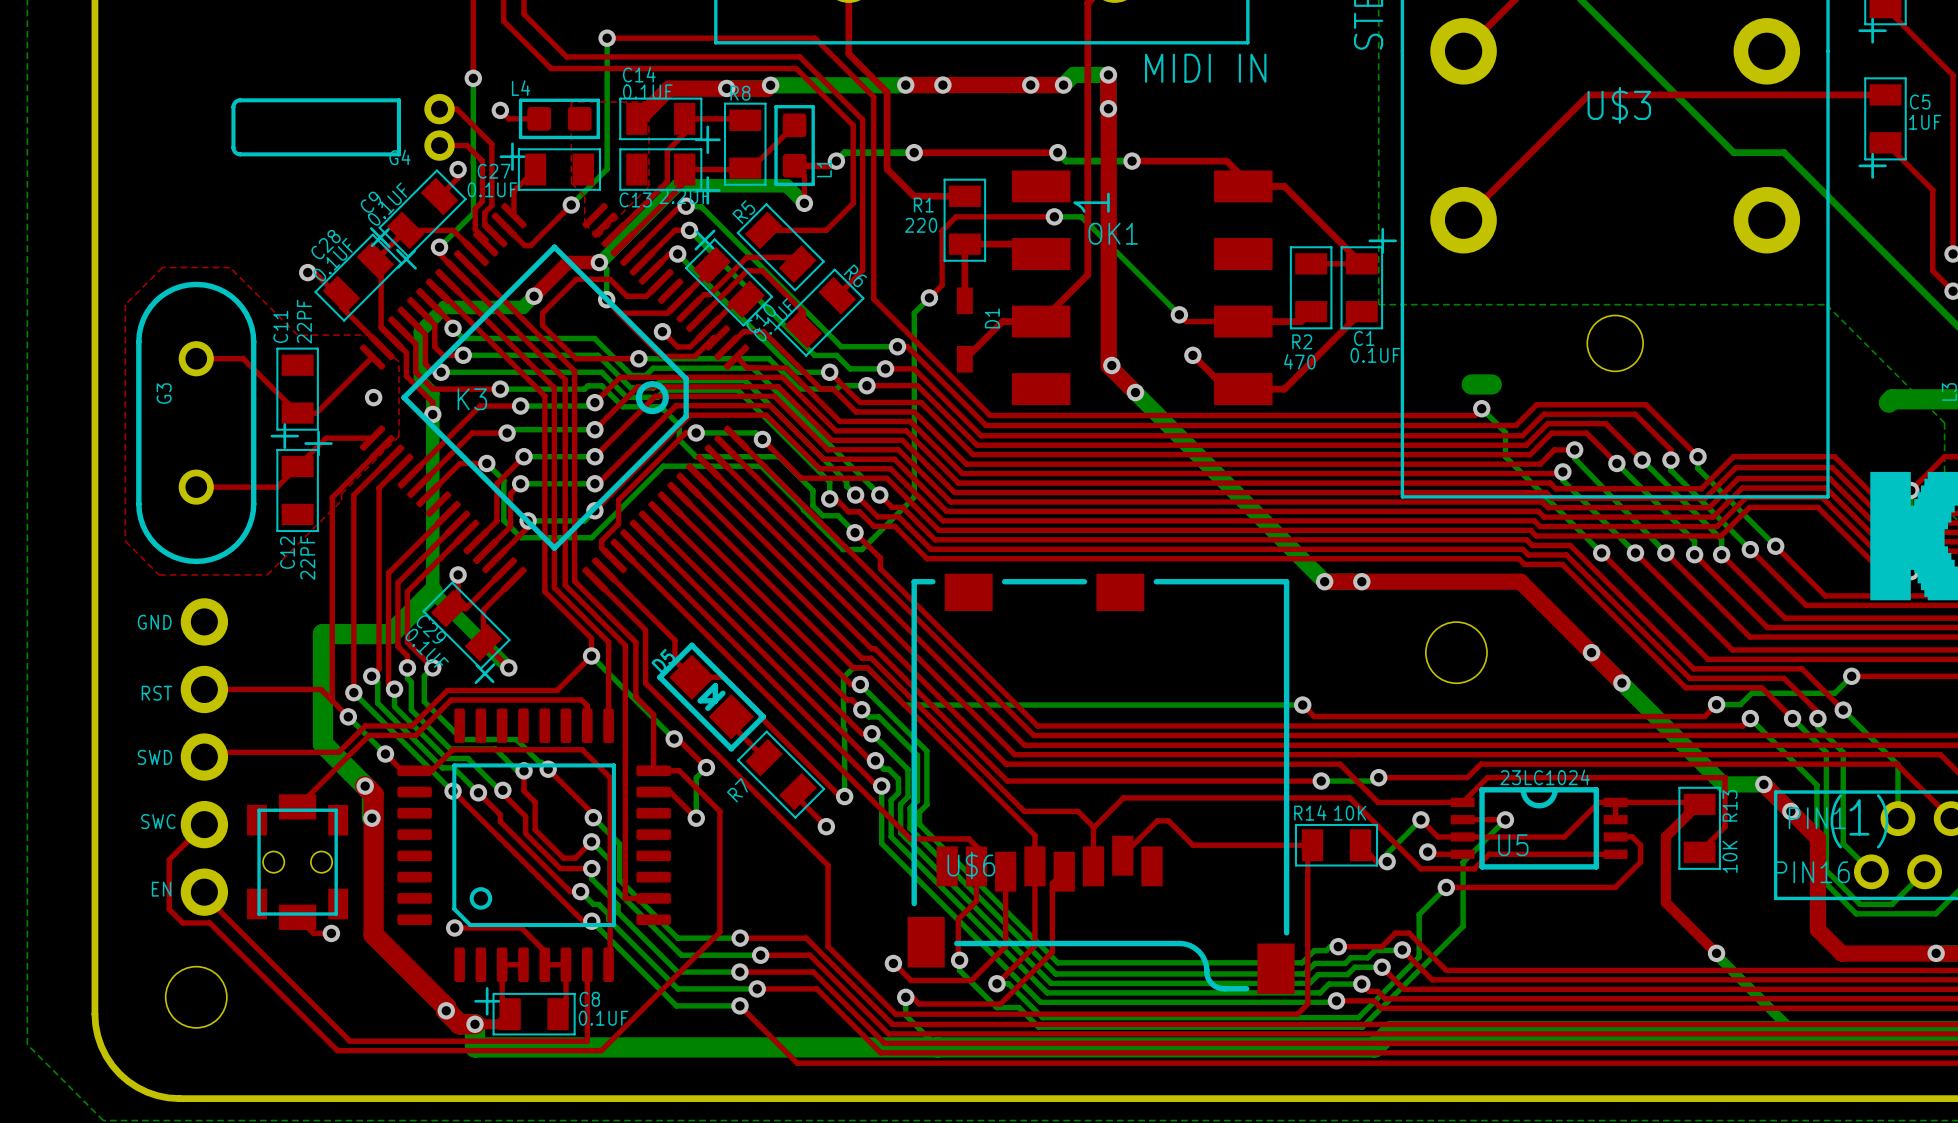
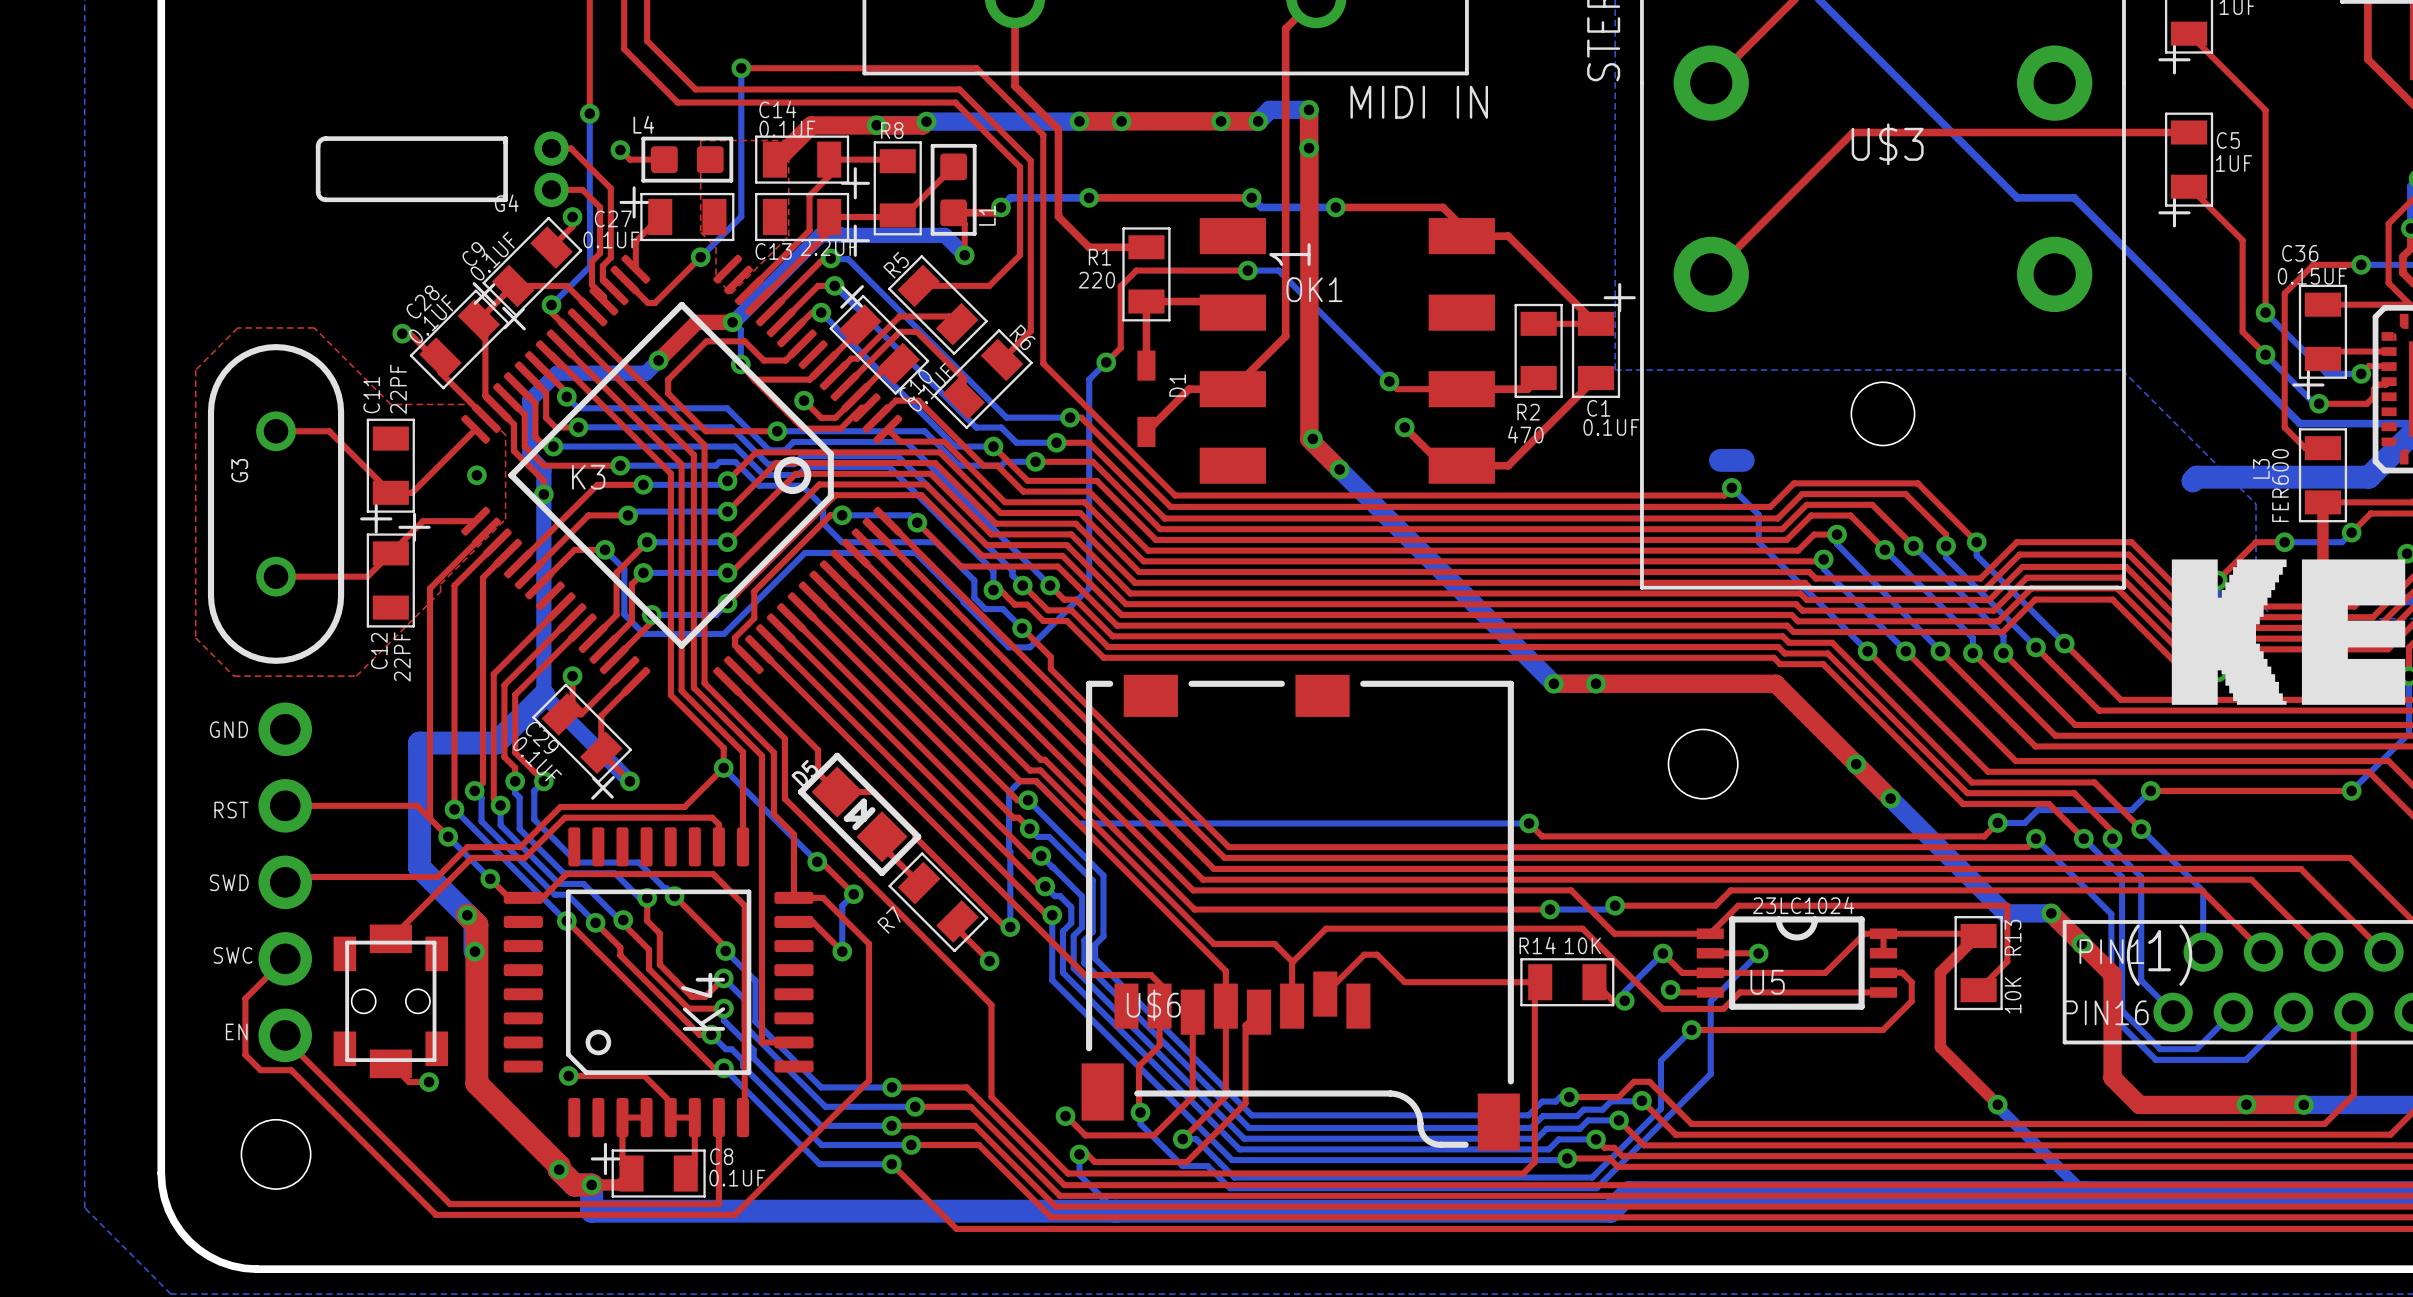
K4 name: none -> K4 (703, 1001)

